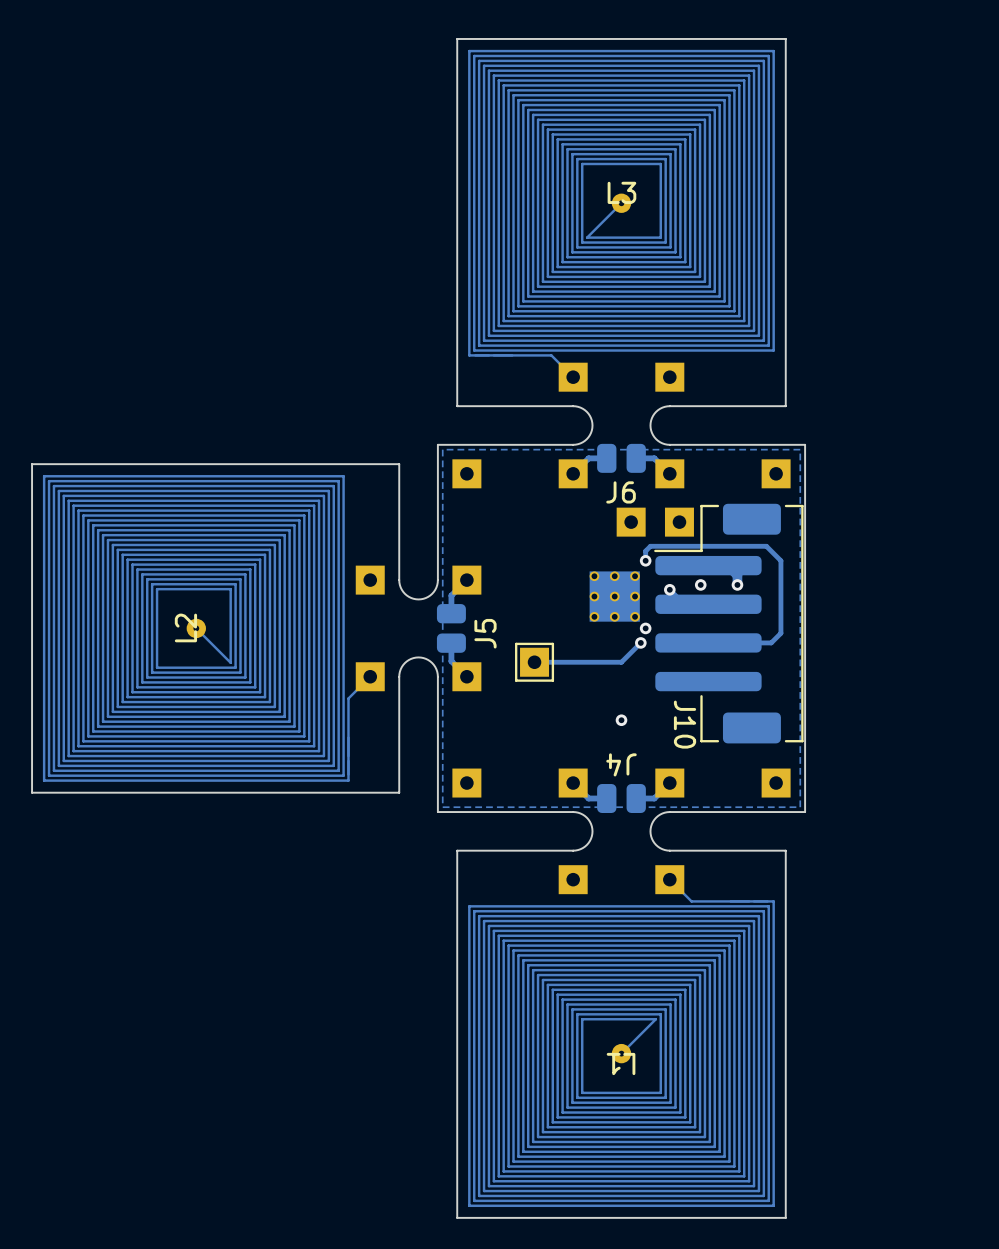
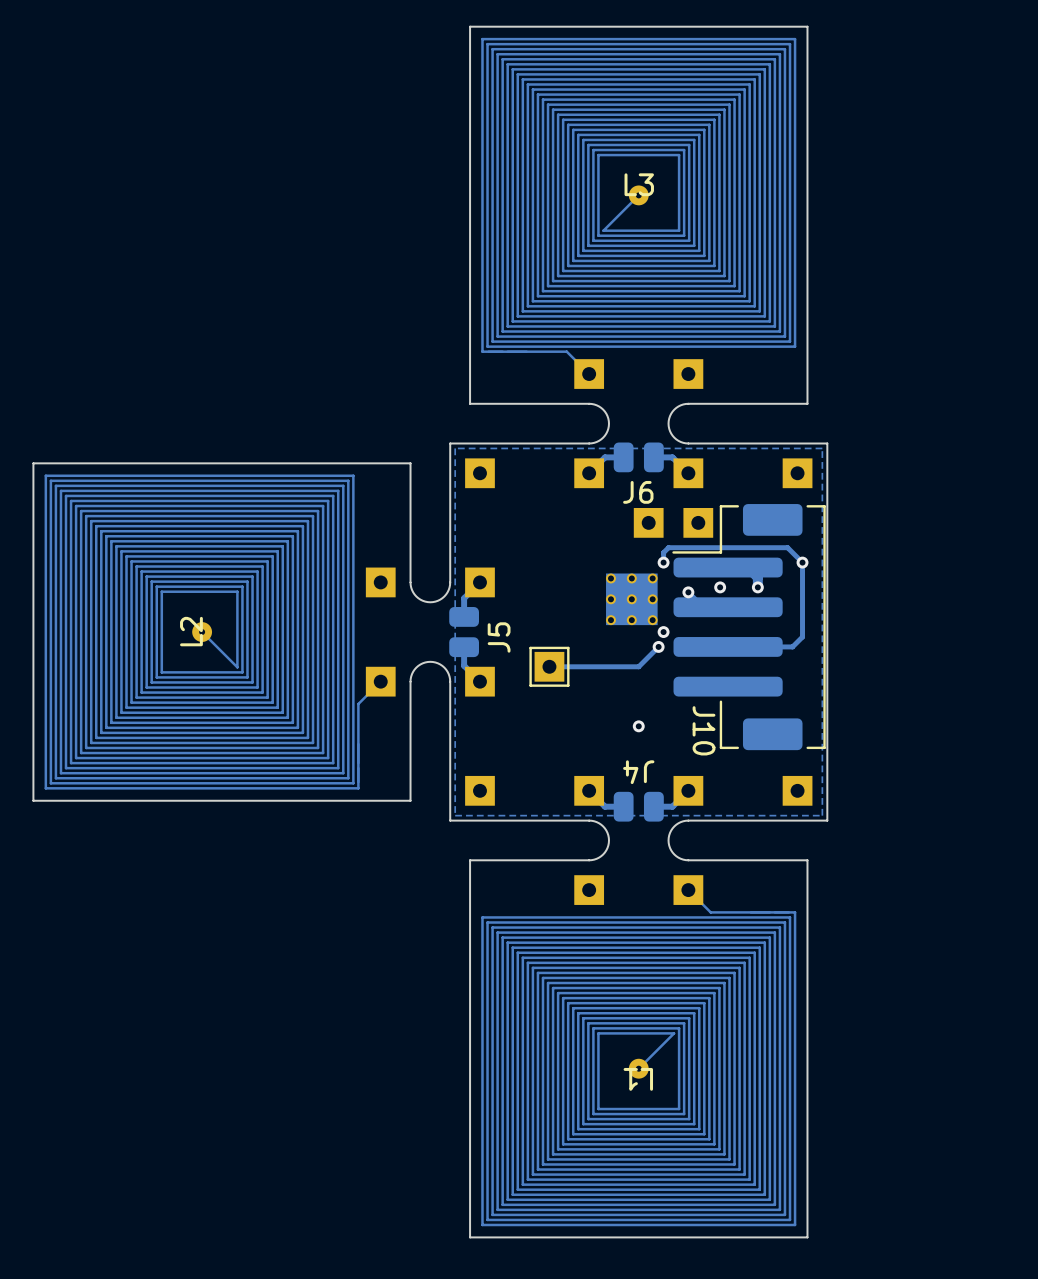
via: none -> (802, 562)

